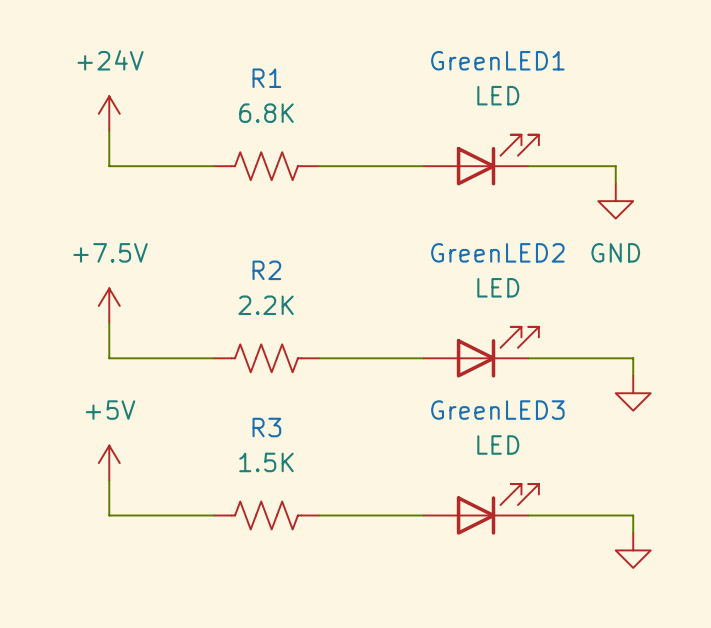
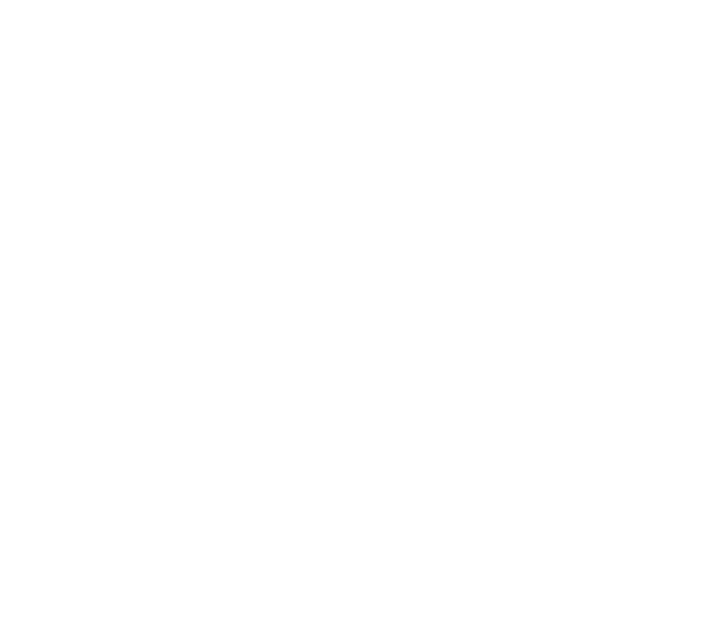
power symbol: +24V (109, 113) -> none
wire: (109, 131) (109, 166) (214, 166) -> none
GreenLED1: LED (481, 160) -> none
R1: 6.8K (266, 166) -> none
wire: (318, 166) (423, 166) -> none
wire: (528, 166) (615, 166) (615, 183) -> none
power symbol: GND (615, 201) -> none
power symbol: +7.5V (109, 305) -> none
wire: (109, 323) (109, 358) (214, 358) -> none
GreenLED2: LED (481, 352) -> none
R2: 2.2K (266, 358) -> none
wire: (318, 358) (423, 358) -> none
wire: (528, 358) (633, 358) (633, 375) -> none
power symbol: (633, 393) -> none
power symbol: +5V (109, 463) -> none
wire: (109, 480) (109, 515) (214, 515) -> none
GreenLED3: LED (481, 509) -> none
R3: 1.5K (266, 515) -> none
wire: (318, 515) (423, 515) -> none
wire: (528, 515) (633, 515) (633, 532) -> none
power symbol: (633, 550) -> none

